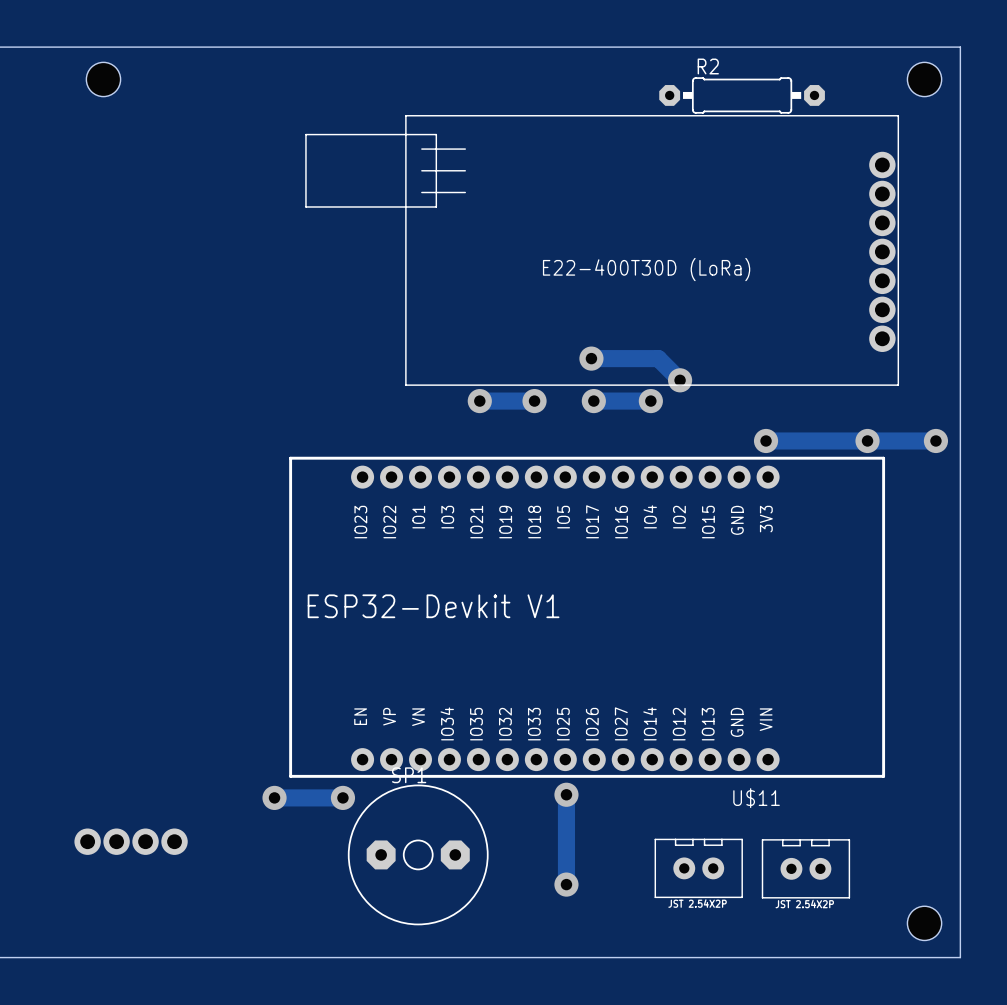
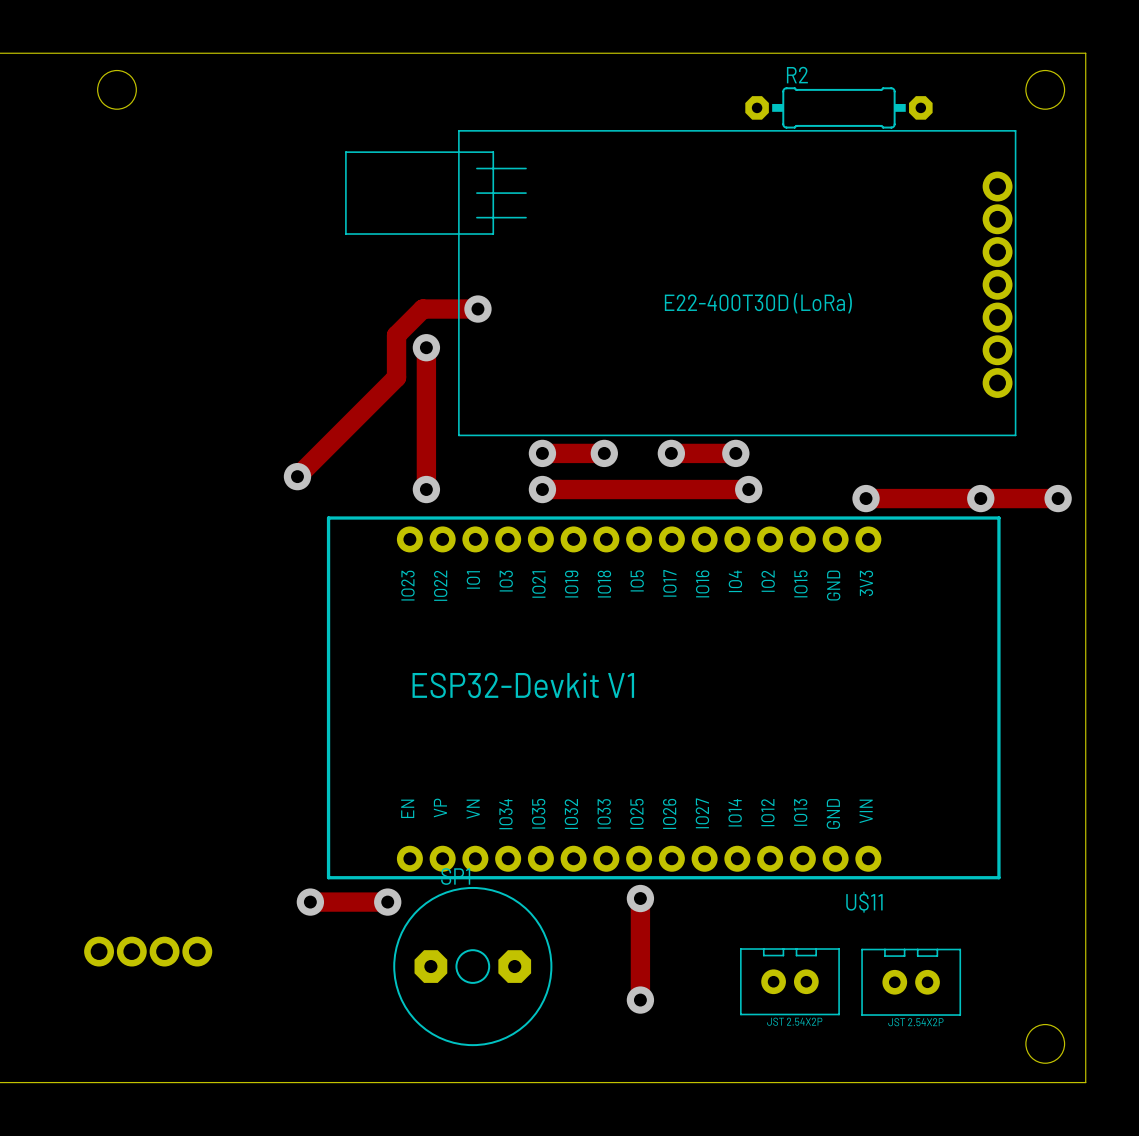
track: none -> (477, 309) (422, 309) (396, 335) (396, 377) (297, 476)
via: none -> (477, 309)
track: none -> (426, 347) (426, 489)
via: none -> (426, 347)
track: (591, 358) (658, 358) (680, 380) -> none
via: (591, 358) -> none
via: (680, 380) -> none
via: none -> (297, 476)
via: none -> (426, 489)
track: none -> (542, 489) (748, 489)
via: none -> (542, 489)
via: none -> (748, 489)

